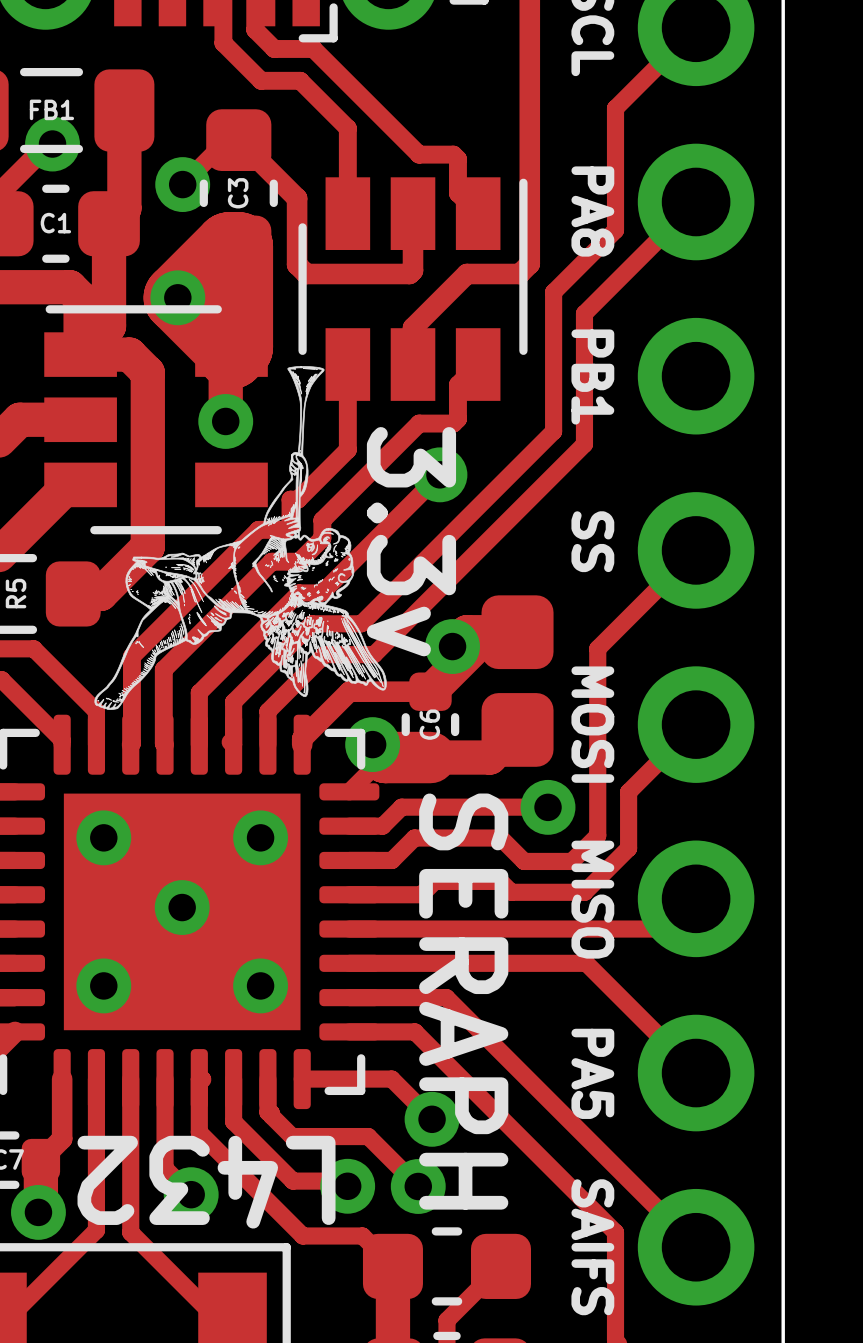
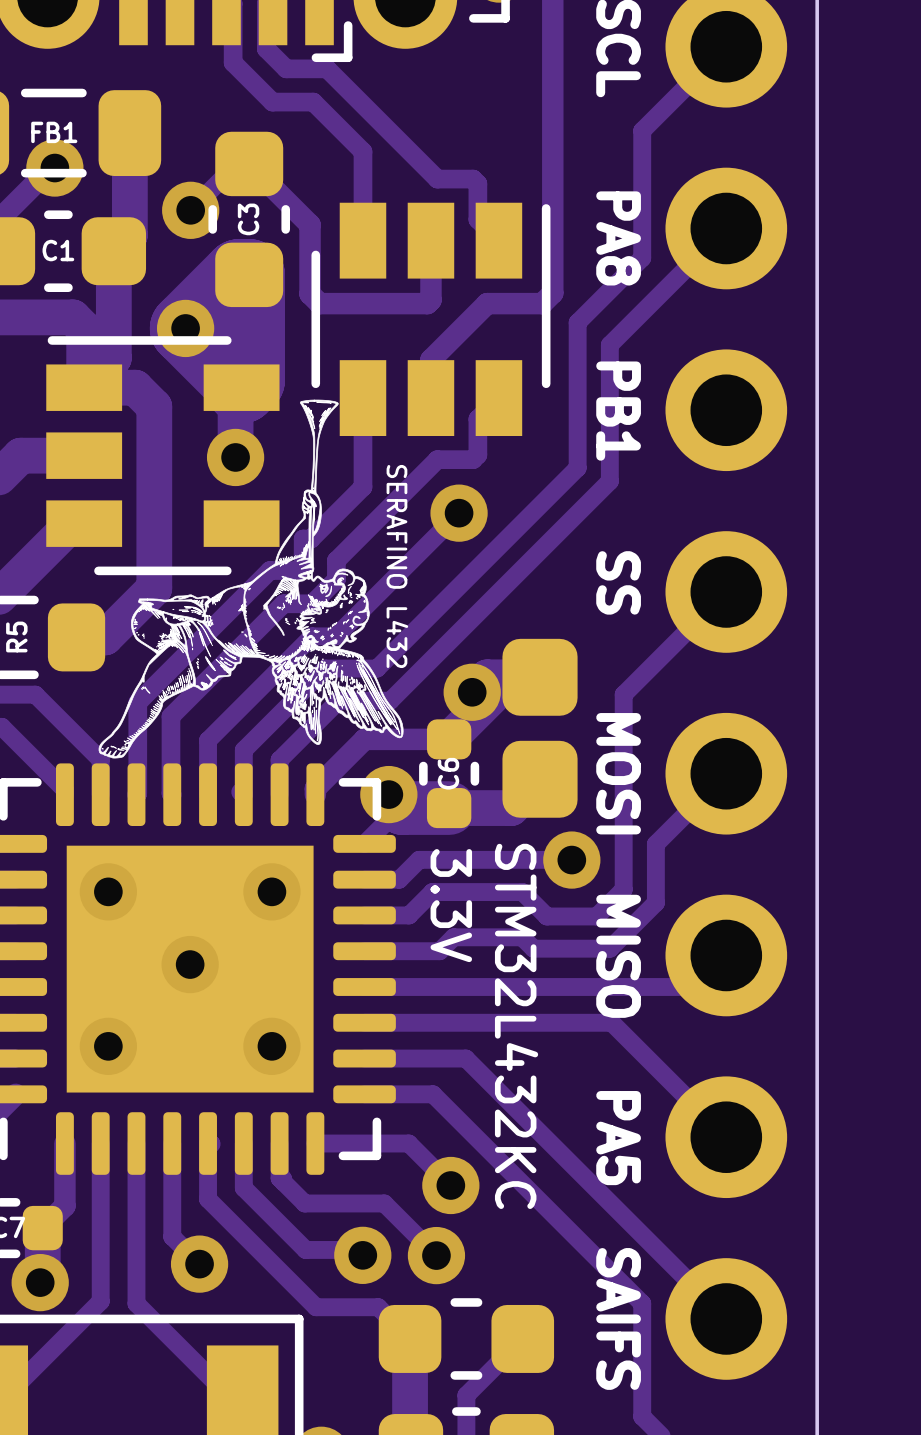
text: none -> SERAFINO L432 (397, 566)
text: 3.3v (411, 541) -> none
text: none -> 3.3V (451, 905)
text: SERAPH (463, 1001) -> STM32L432KC (516, 1026)
text: L432 (206, 1182) -> none

